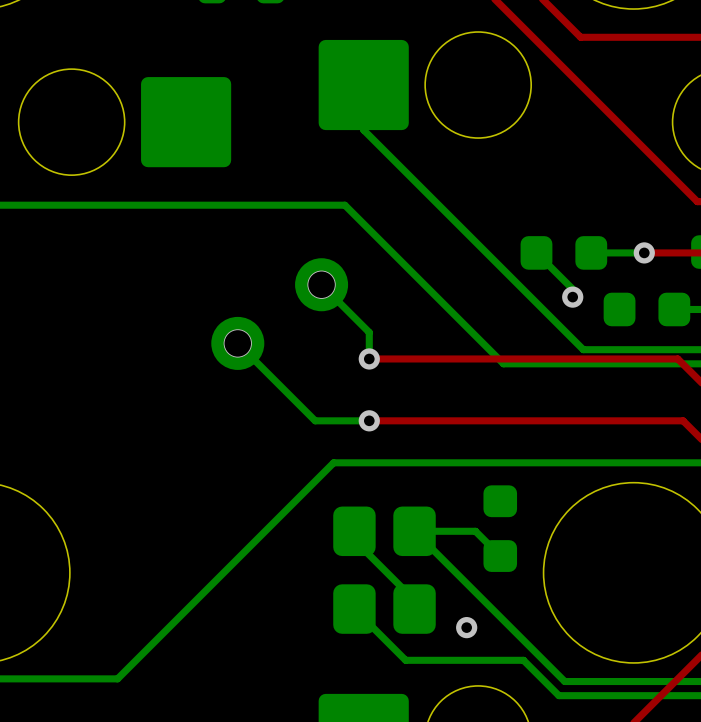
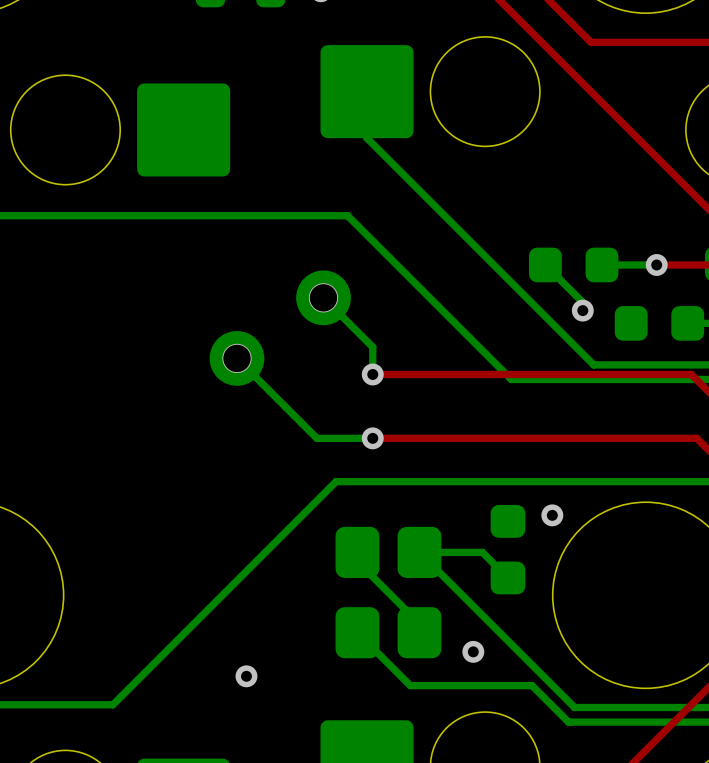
via: none -> (552, 515)
via: none -> (246, 676)

